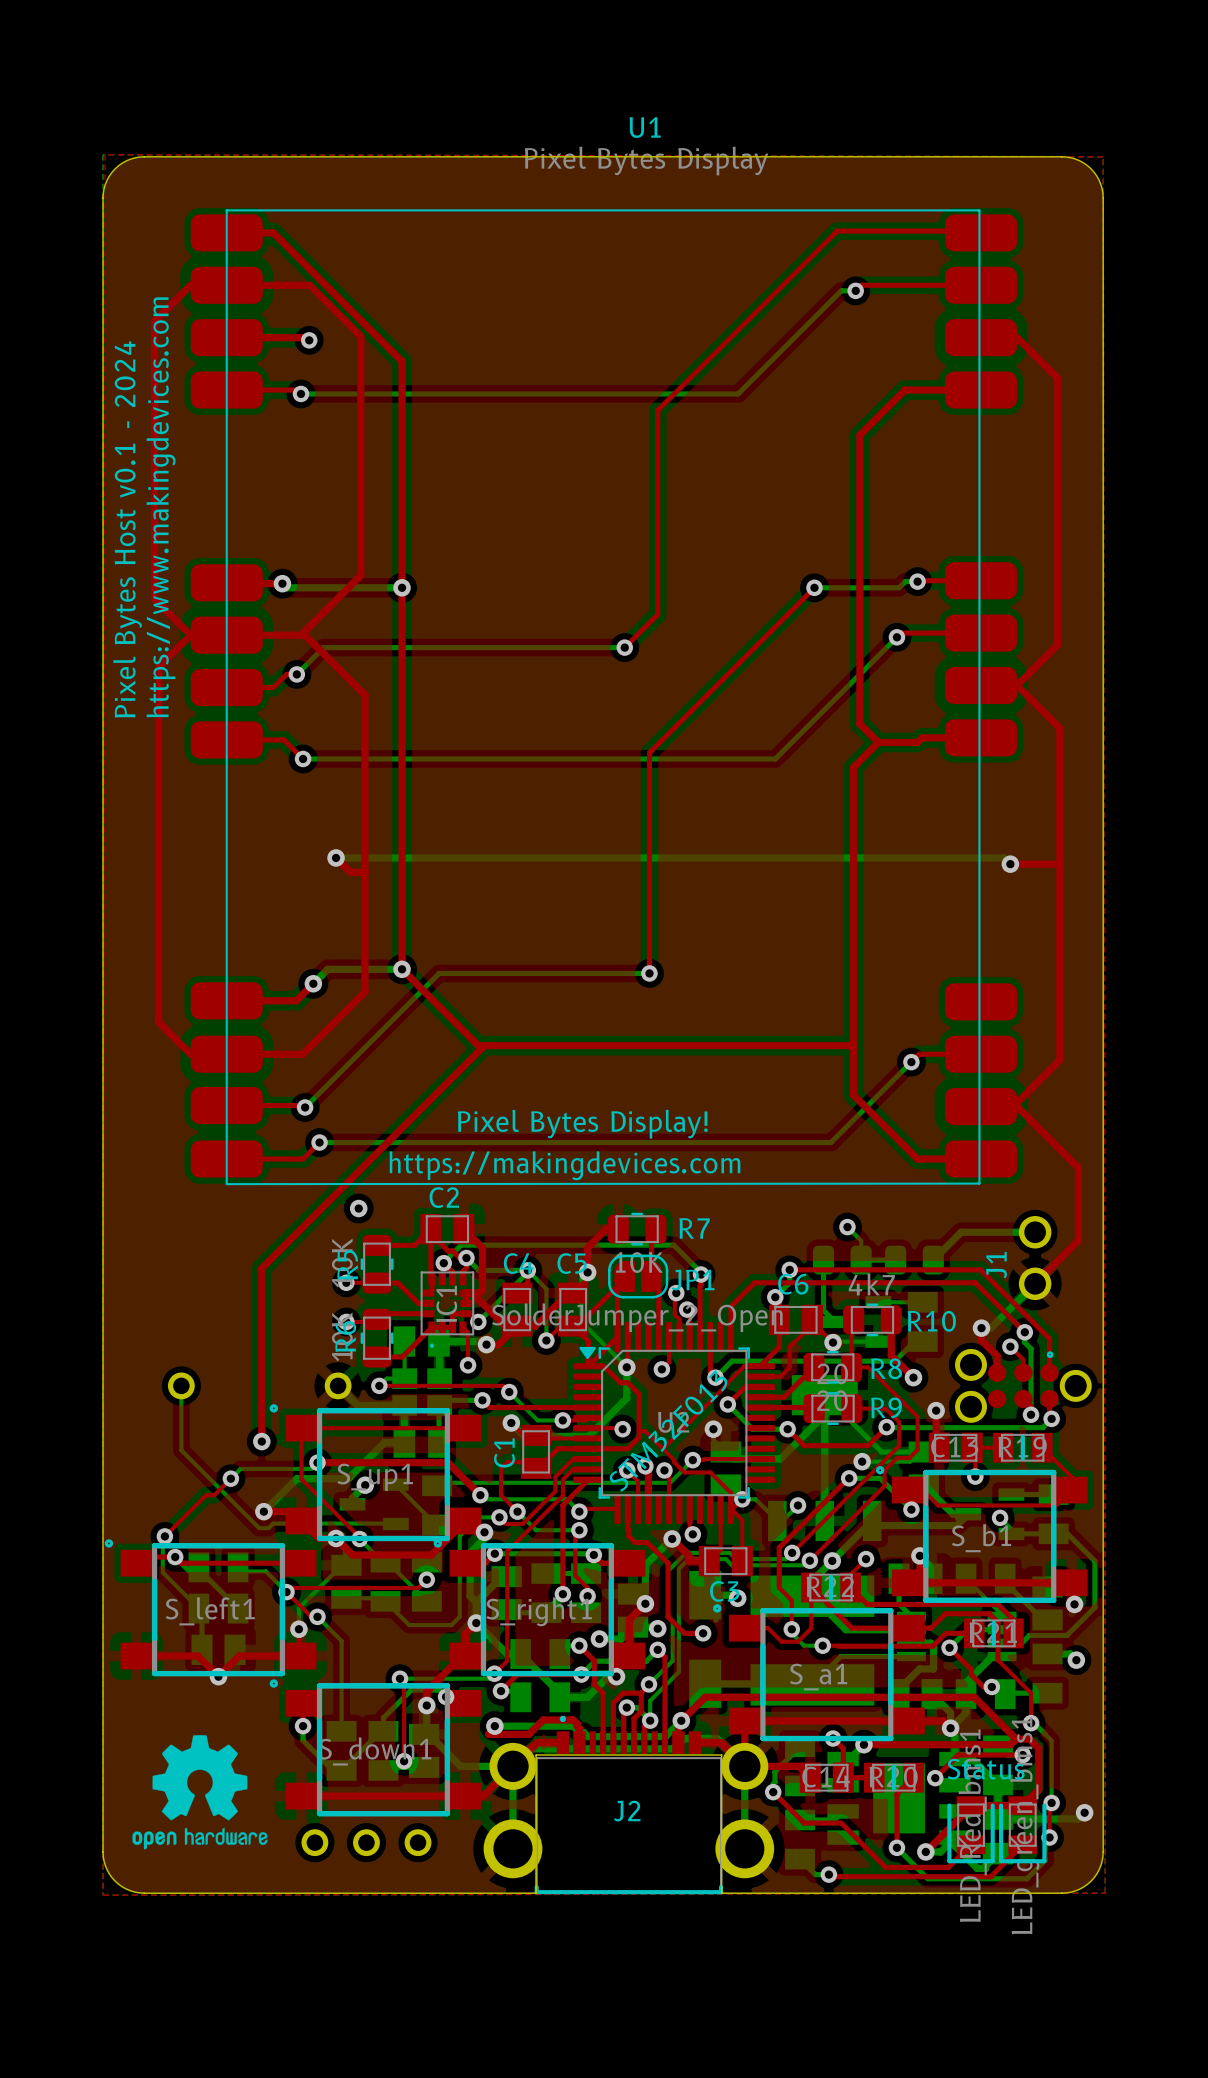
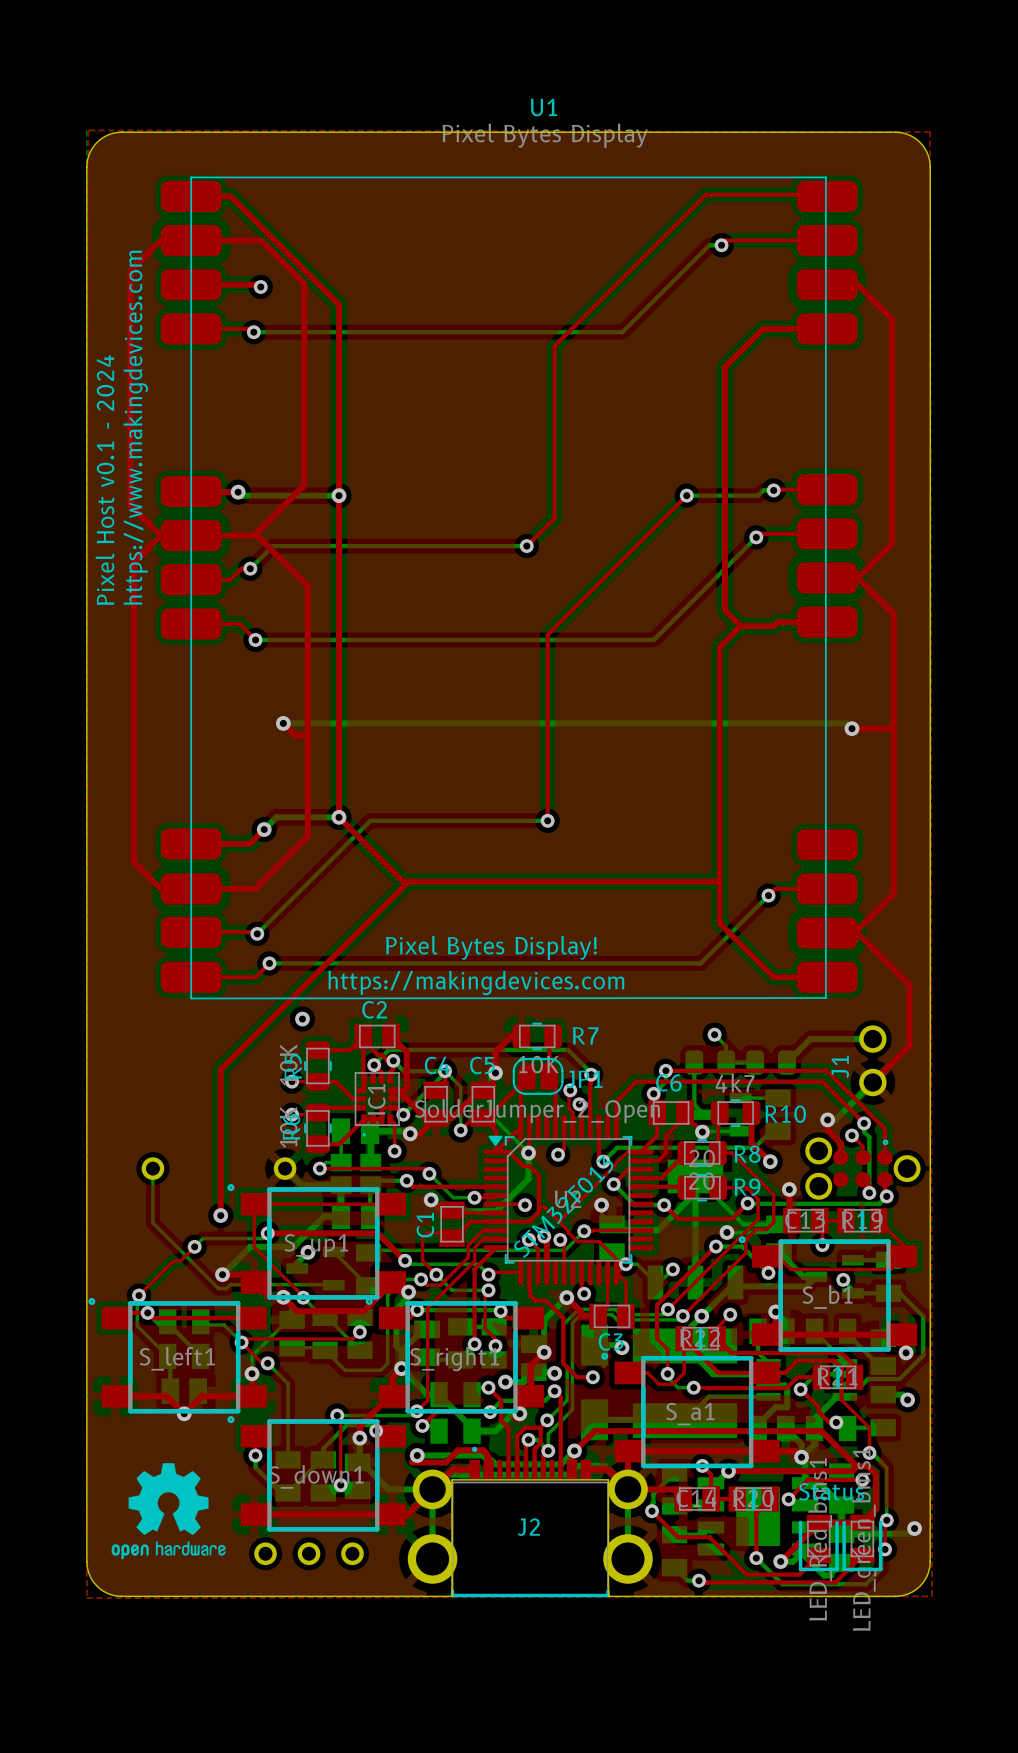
text: Pixel Bytes Host v0.1 - 2024 (127, 529) -> Pixel Host v0.1 - 2024 (104, 480)

